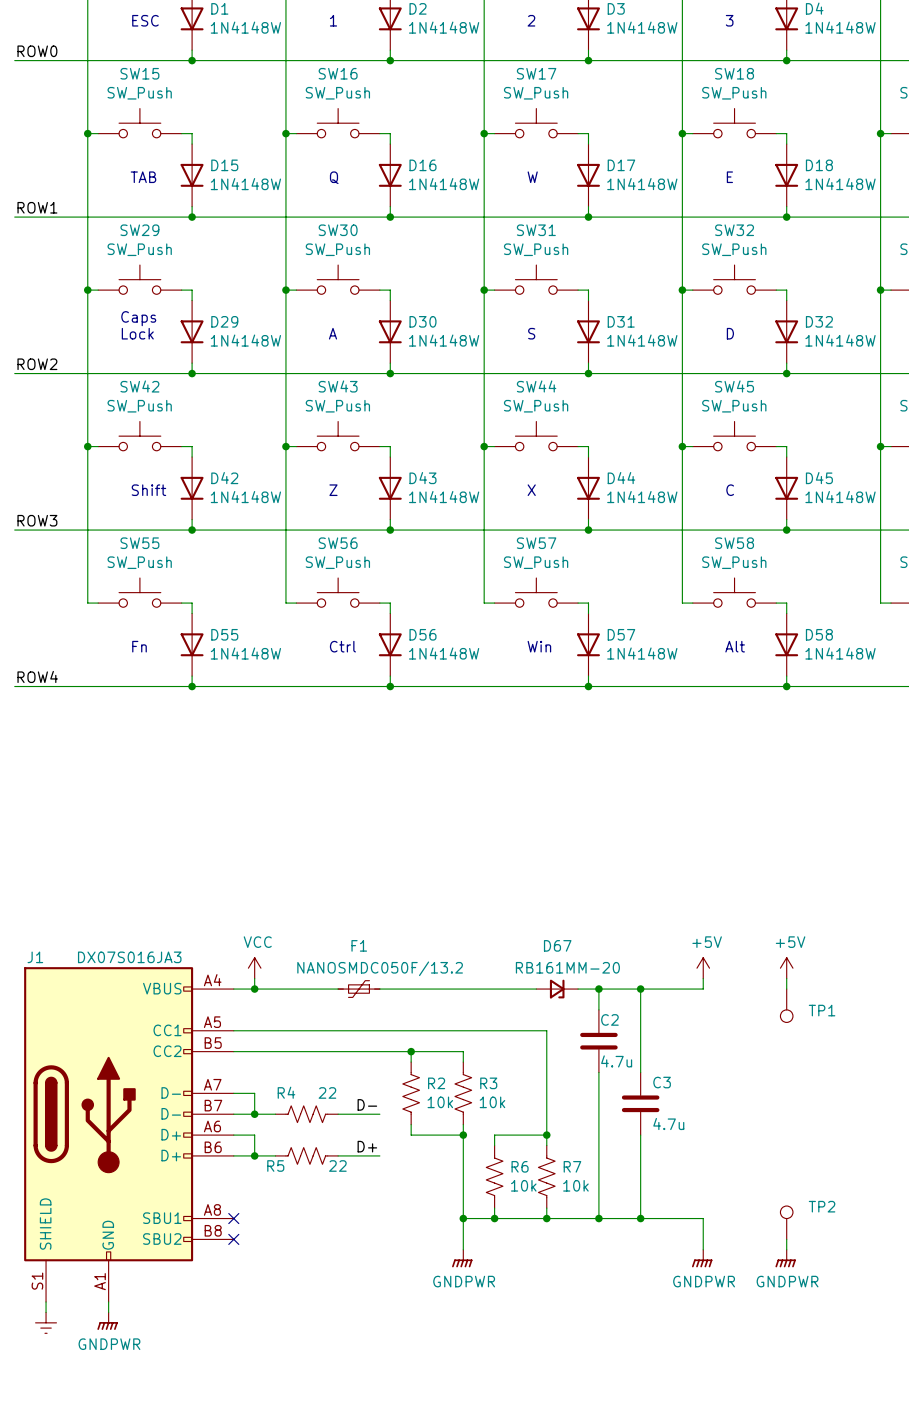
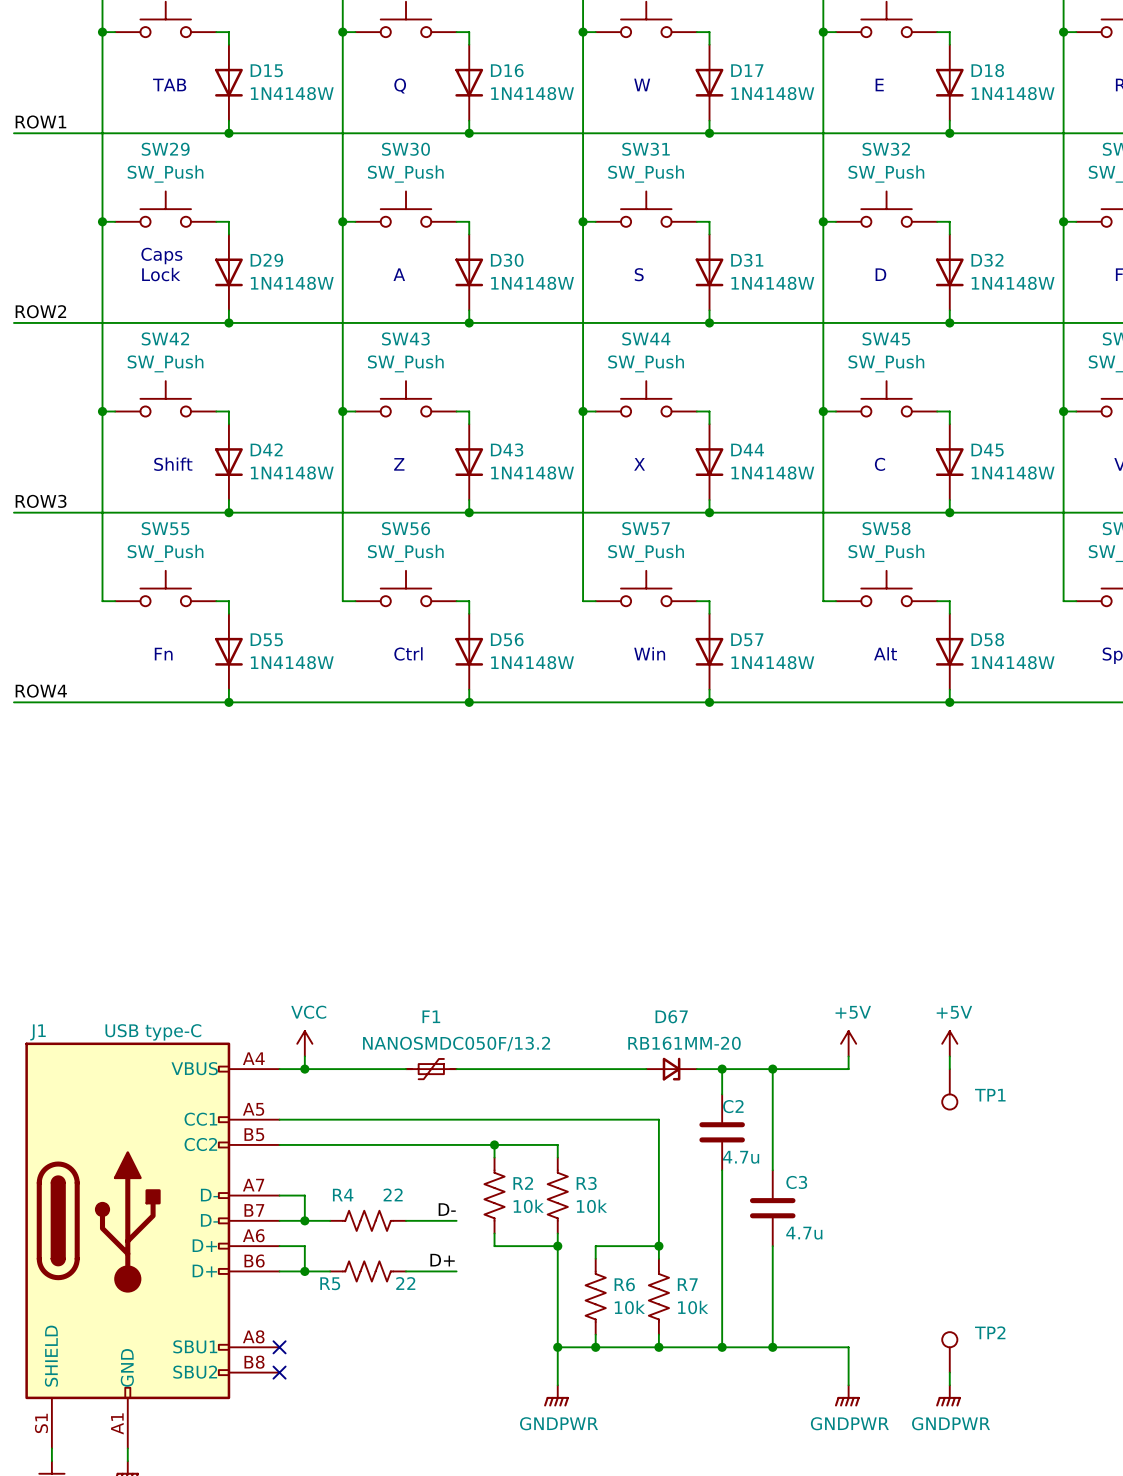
J1 value: DX07S016JA3 (129, 957) -> USB type-C (153, 1032)

